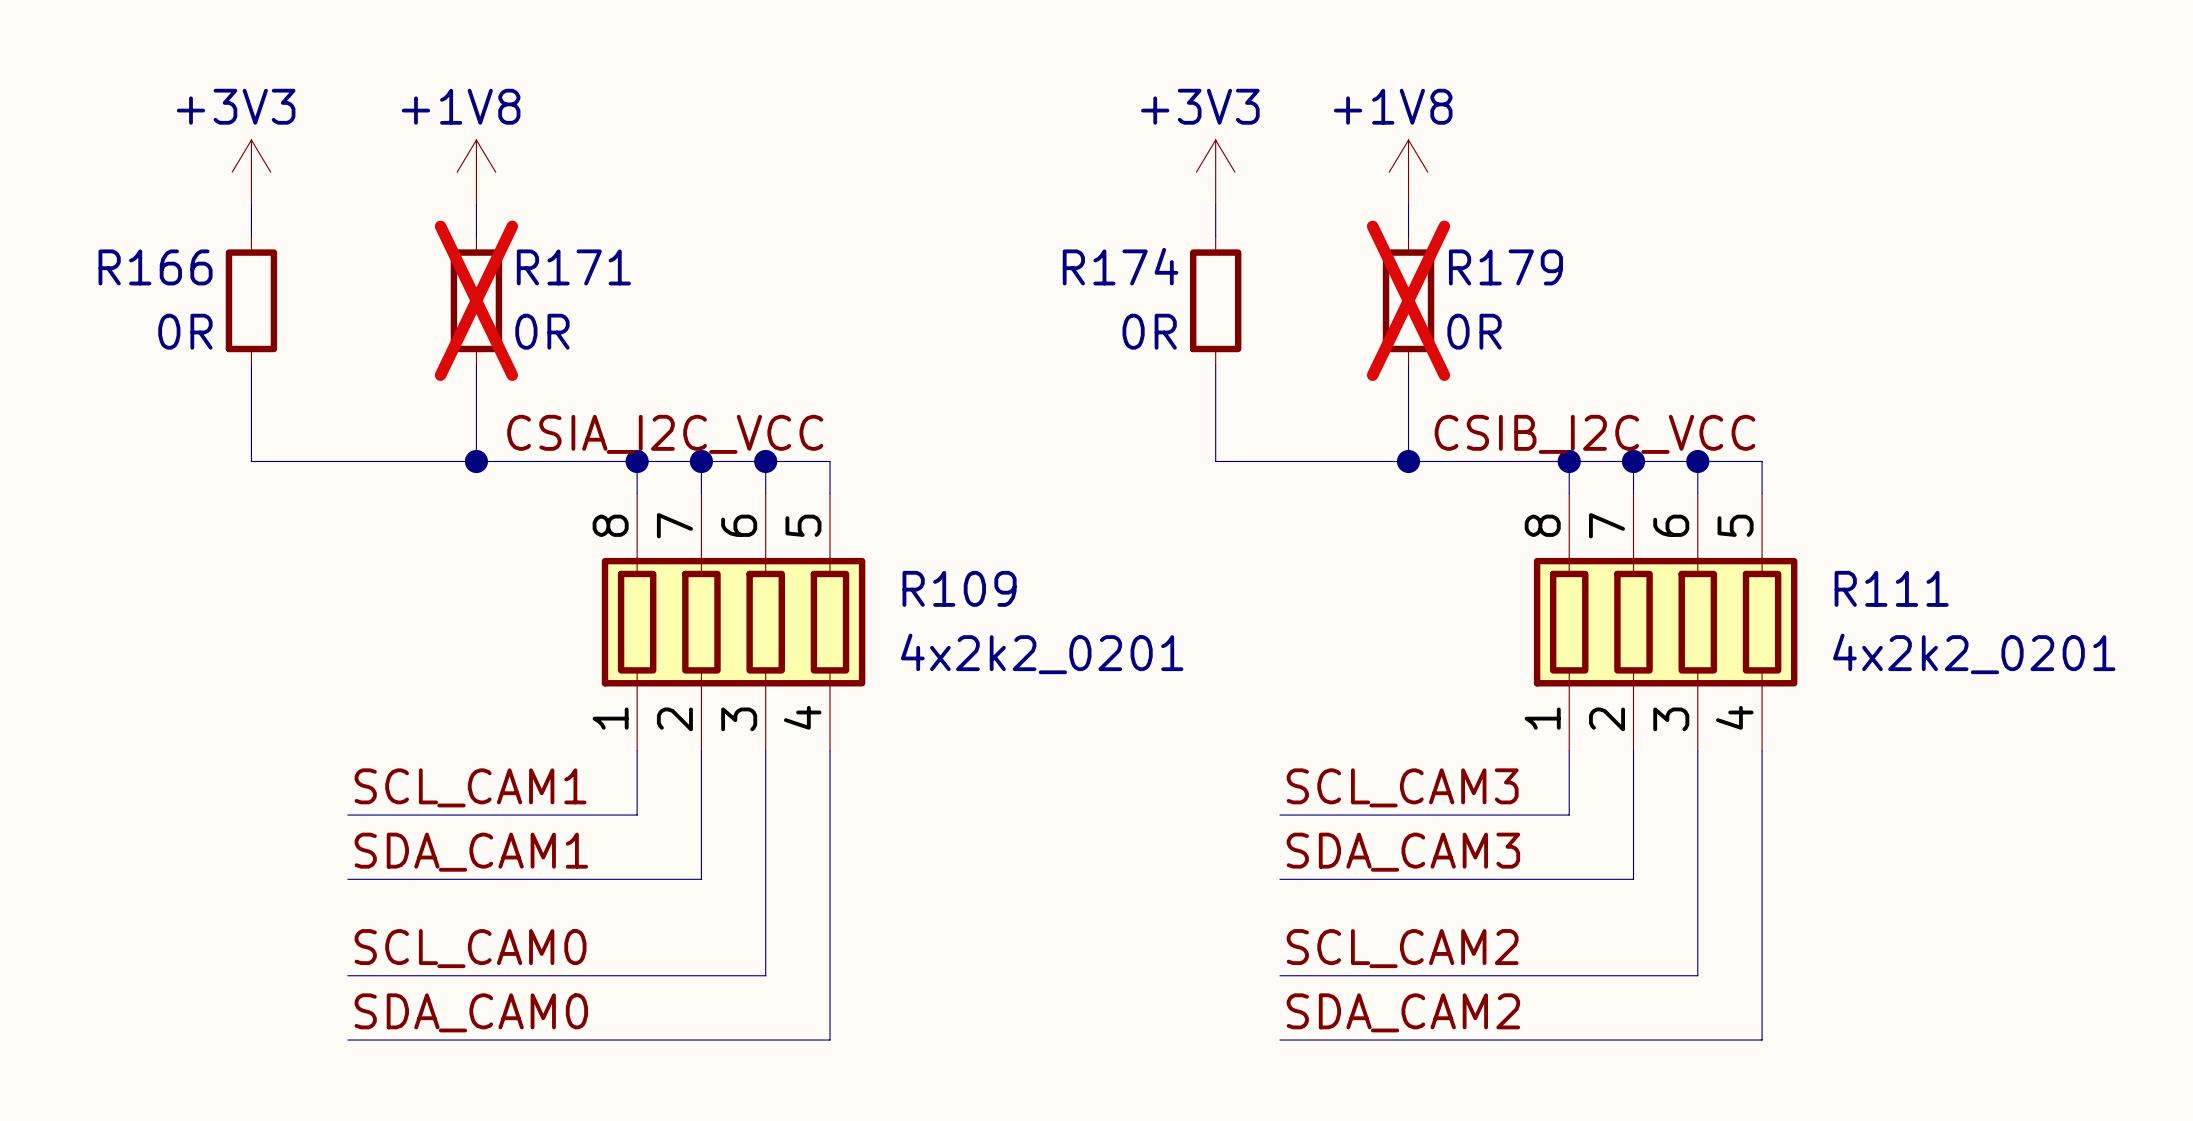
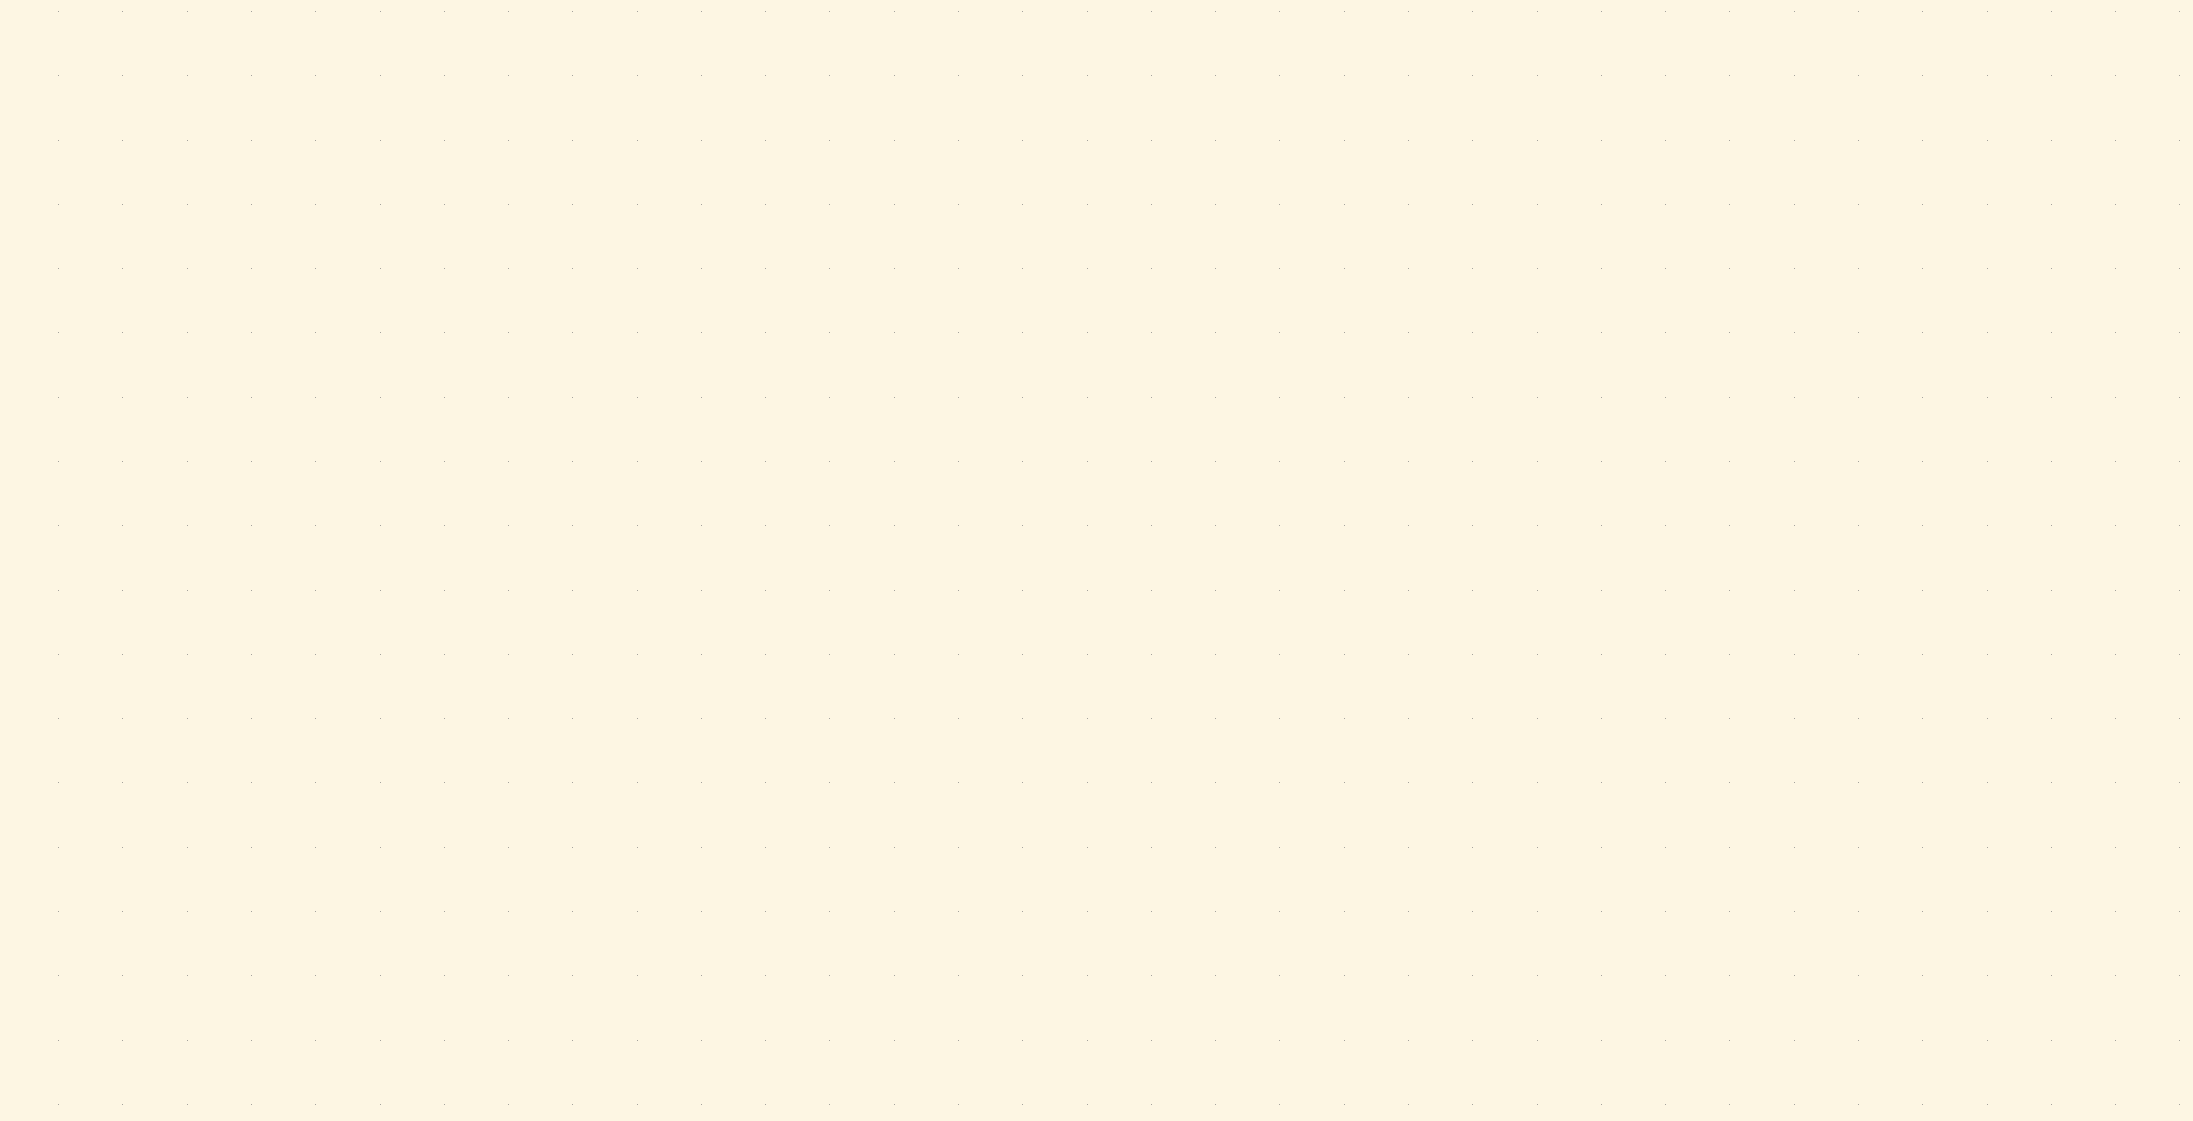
power symbol: +3V3 (251, 172) -> none
power symbol: +1V8 (476, 172) -> none
power symbol: +3V3 (1215, 172) -> none
power symbol: +1V8 (1408, 172) -> none
wire: (251, 204) (251, 236) -> none
wire: (476, 204) (476, 236) -> none
wire: (1215, 204) (1215, 236) -> none
wire: (1408, 204) (1408, 236) -> none
R166: (251, 300) -> none
R171: (476, 300) -> none
R174: (1215, 300) -> none
R179: (1408, 300) -> none
wire: (251, 365) (251, 461) (829, 461) (829, 493) -> none
wire: (476, 365) (476, 461) -> none
wire: (1215, 365) (1215, 461) (1762, 461) (1762, 493) -> none
wire: (1408, 365) (1408, 461) -> none
label: CSIA_I2C_VCC (665, 434) -> none
label: CSIB_I2C_VCC (1595, 434) -> none
junction: (476, 461) -> none
wire: (637, 461) (637, 493) -> none
junction: (637, 461) -> none
wire: (701, 461) (701, 493) -> none
junction: (701, 461) -> none
wire: (765, 461) (765, 493) -> none
junction: (765, 461) -> none
junction: (1408, 461) -> none
wire: (1569, 461) (1569, 493) -> none
junction: (1569, 461) -> none
wire: (1633, 461) (1633, 493) -> none
junction: (1633, 461) -> none
wire: (1697, 461) (1697, 493) -> none
junction: (1697, 461) -> none
R109: (733, 622) -> none
R111: (1665, 622) -> none
wire: (637, 750) (637, 815) (347, 815) -> none
wire: (701, 750) (701, 879) (347, 879) -> none
wire: (765, 750) (765, 975) (347, 975) -> none
wire: (829, 750) (829, 1040) (347, 1040) -> none
wire: (1569, 750) (1569, 815) (1279, 815) -> none
wire: (1633, 750) (1633, 879) (1279, 879) -> none
wire: (1697, 750) (1697, 975) (1279, 975) -> none
wire: (1762, 750) (1762, 1040) (1279, 1040) -> none
label: SCL_CAM1 (470, 787) -> none
label: SCL_CAM3 (1402, 787) -> none
label: SDA_CAM1 (471, 852) -> none
label: SDA_CAM3 (1403, 852) -> none
label: SCL_CAM0 (470, 948) -> none
label: SCL_CAM2 (1402, 948) -> none
label: SDA_CAM0 (471, 1012) -> none
label: SDA_CAM2 (1403, 1012) -> none

